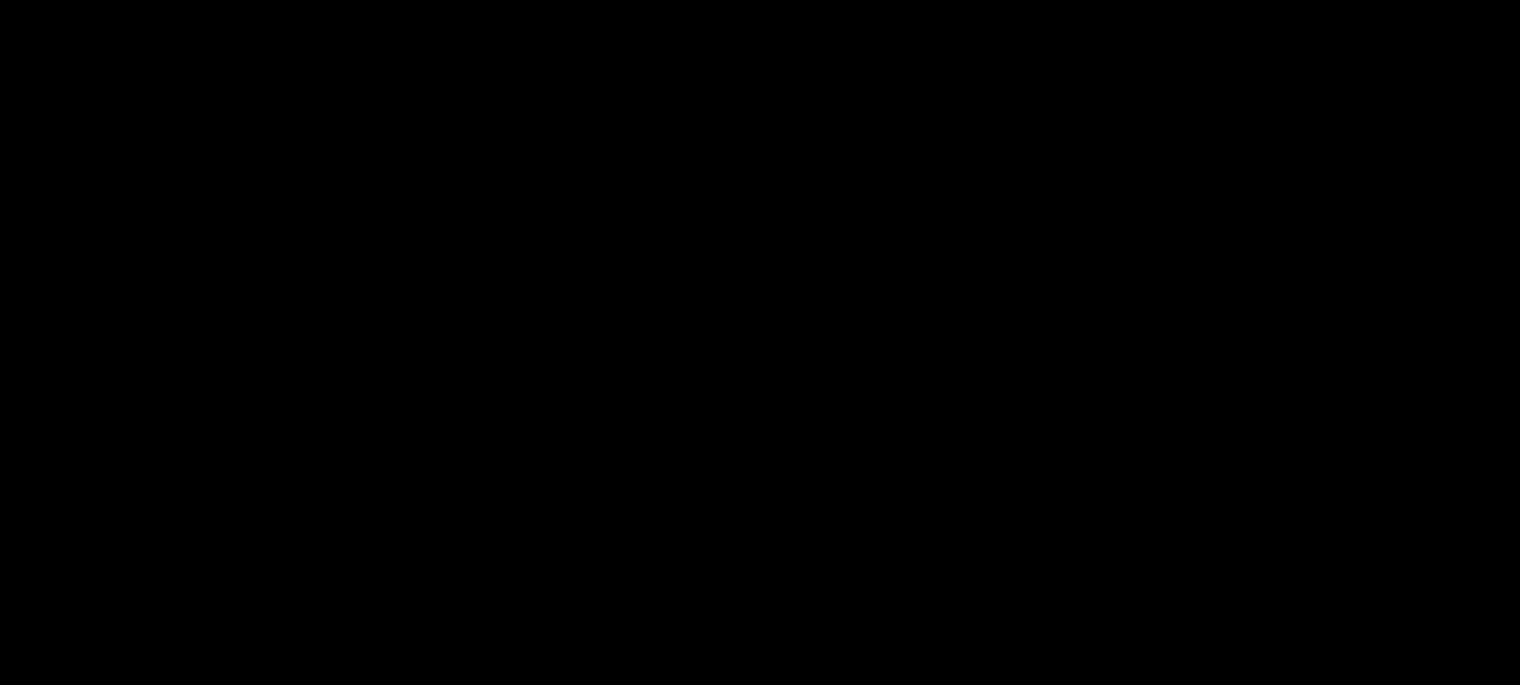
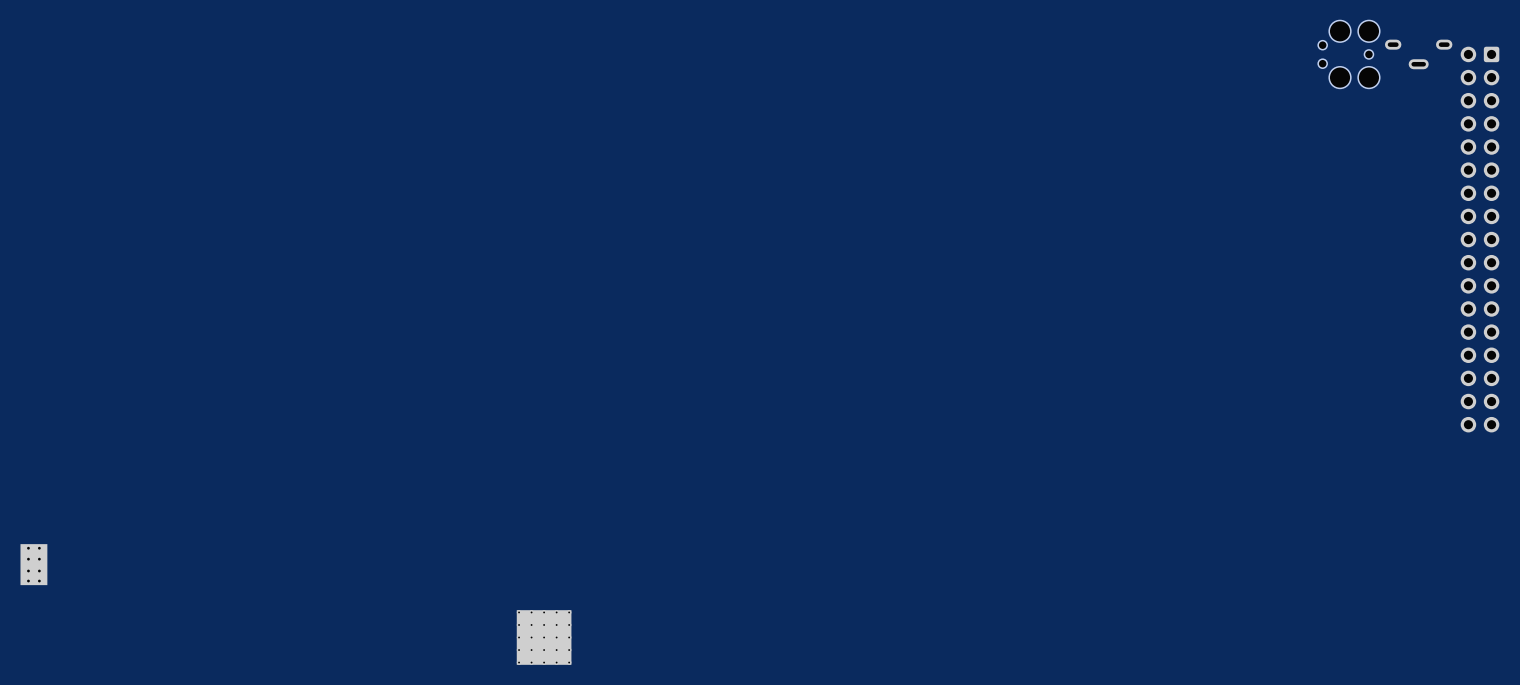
part: none -> (1348, 54)
part: none -> (1418, 54)
part: none -> (1480, 239)
part: none -> (33, 564)
part: none -> (544, 637)

